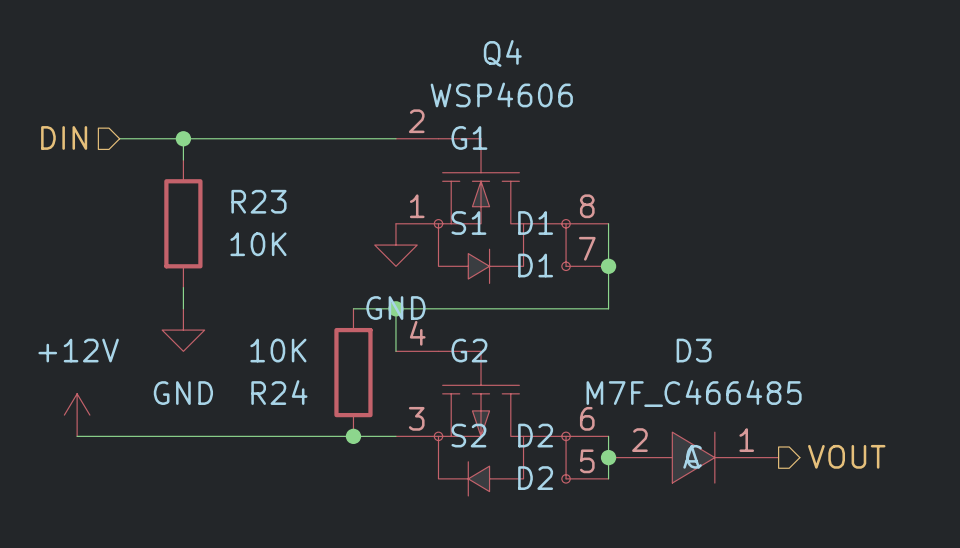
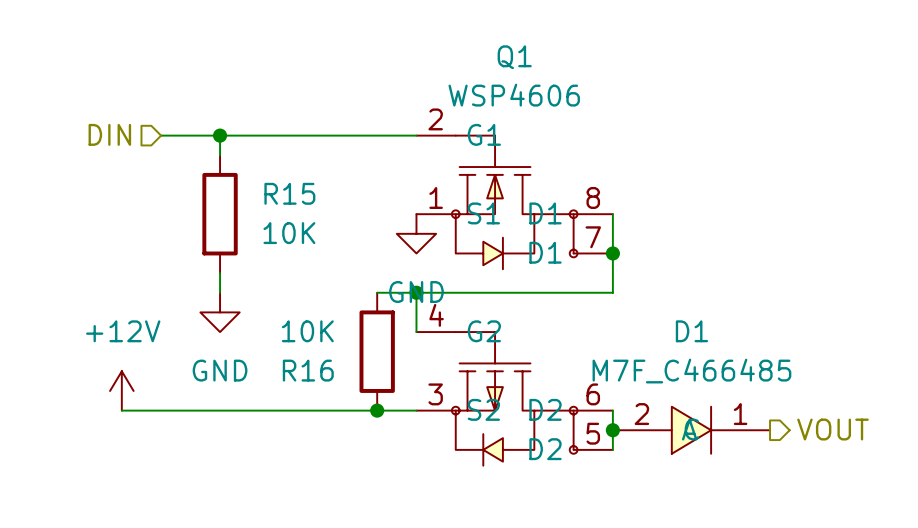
Q4 name: Q4 (502, 53) -> Q1 (514, 57)
R23 name: R23 (258, 201) -> R15 (289, 193)
D3 name: D3 (694, 350) -> D1 (691, 331)
R24 name: R24 (279, 392) -> R16 (308, 370)

